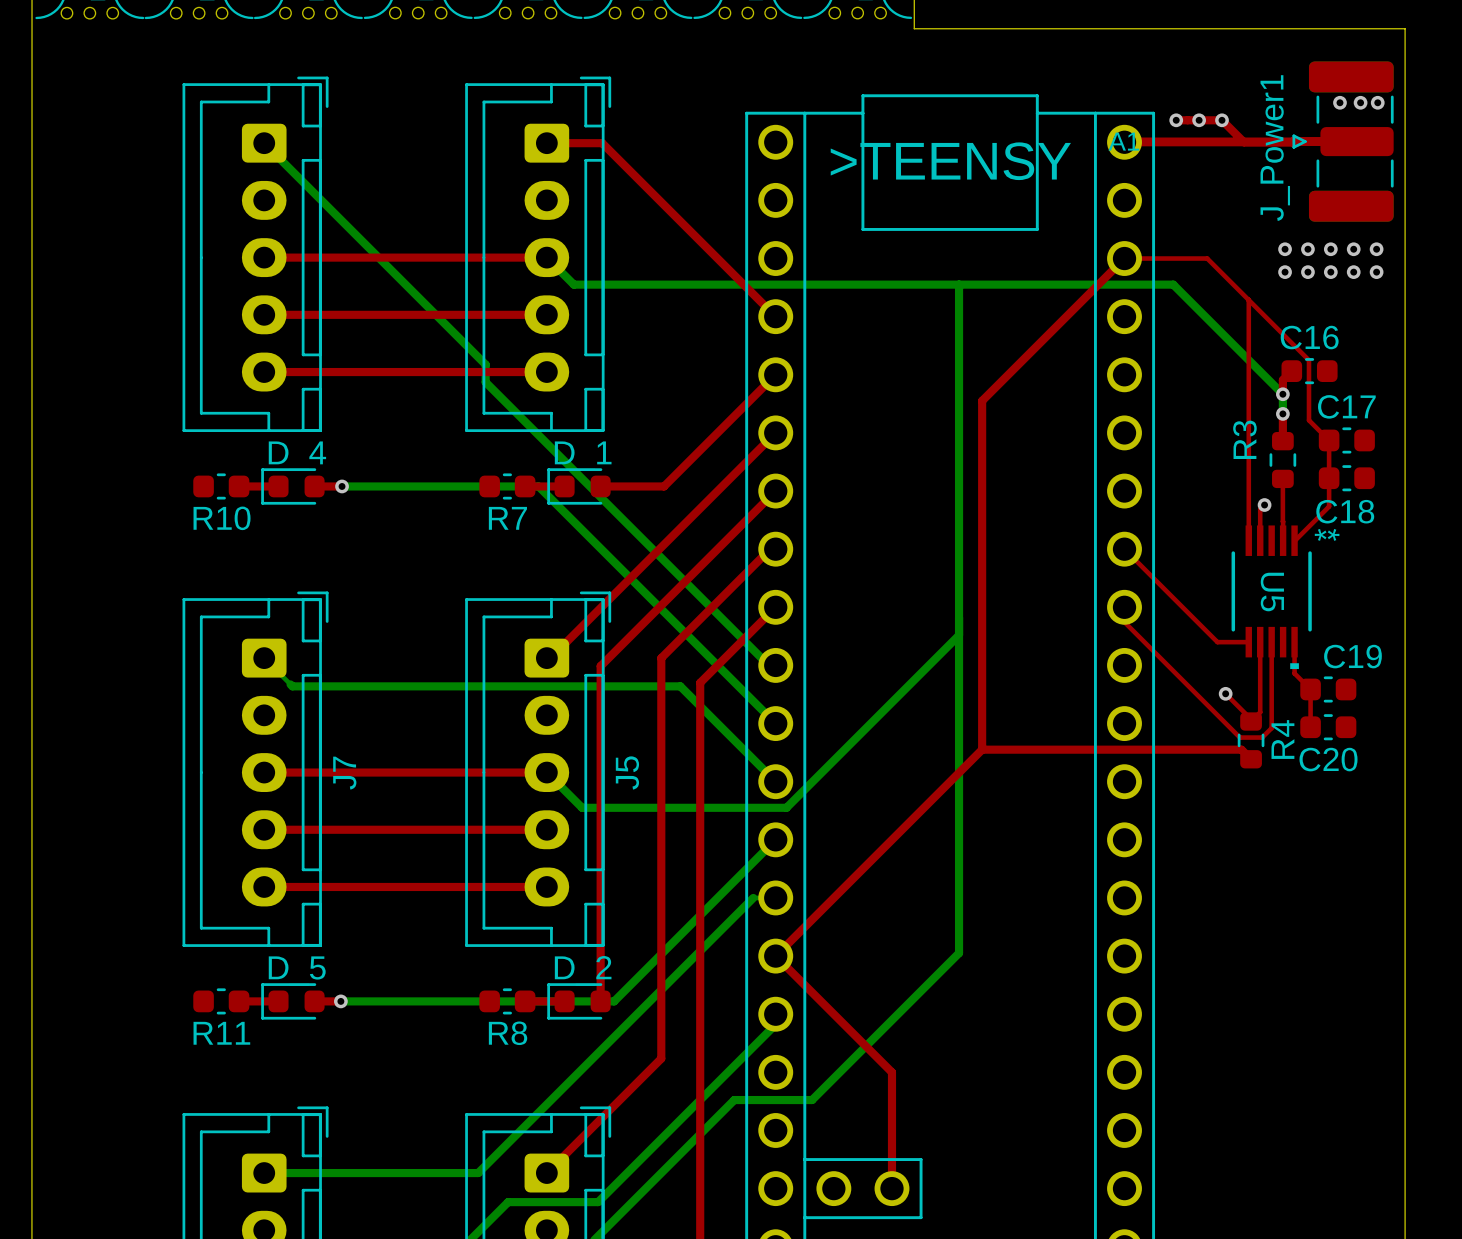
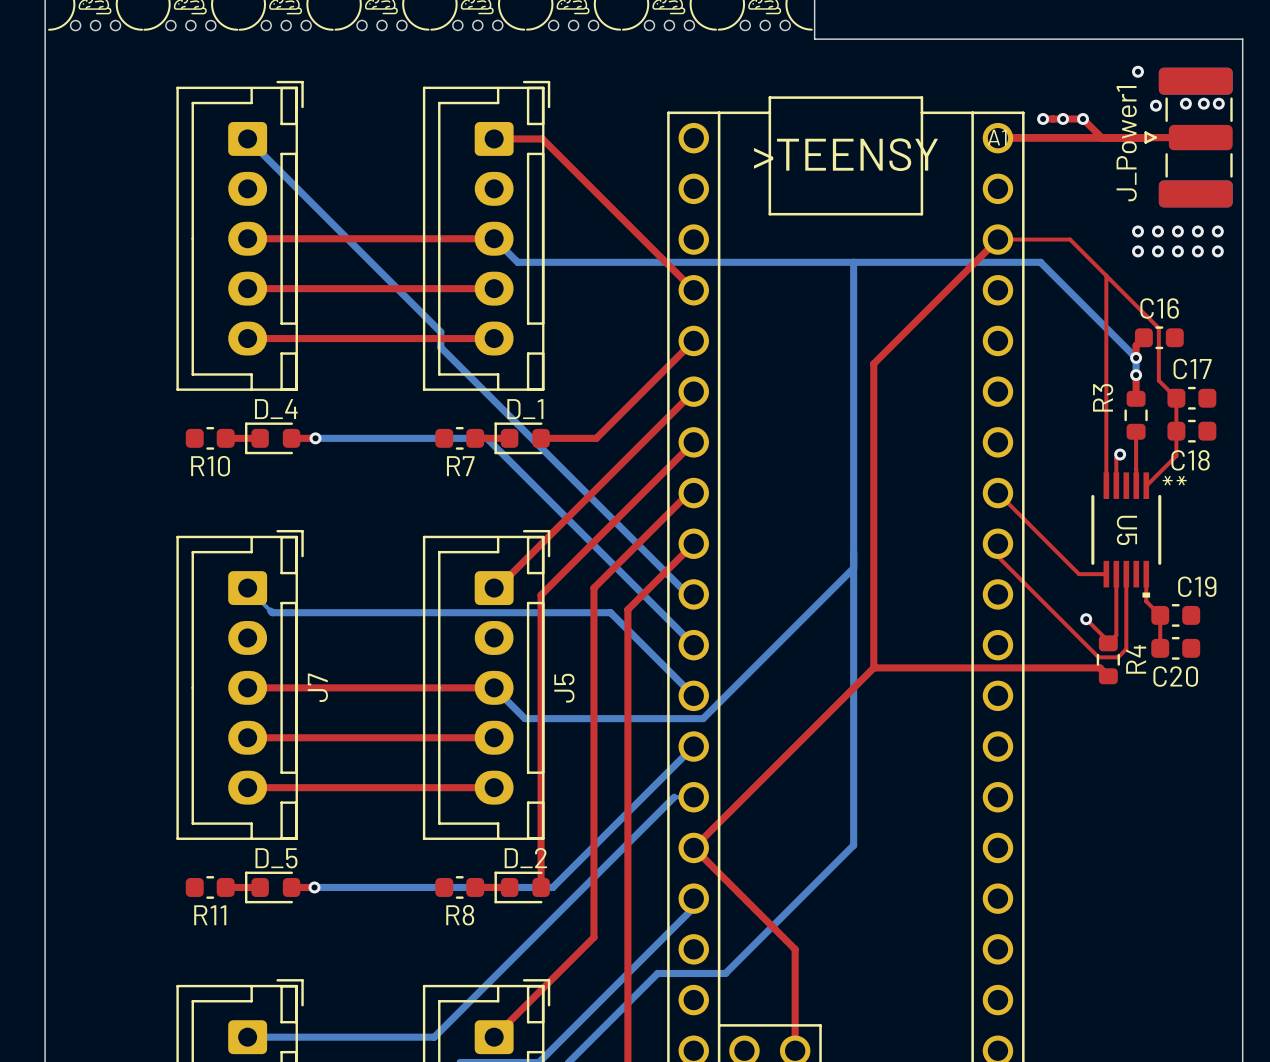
via: none -> (1137, 71)
via: none -> (1155, 105)

